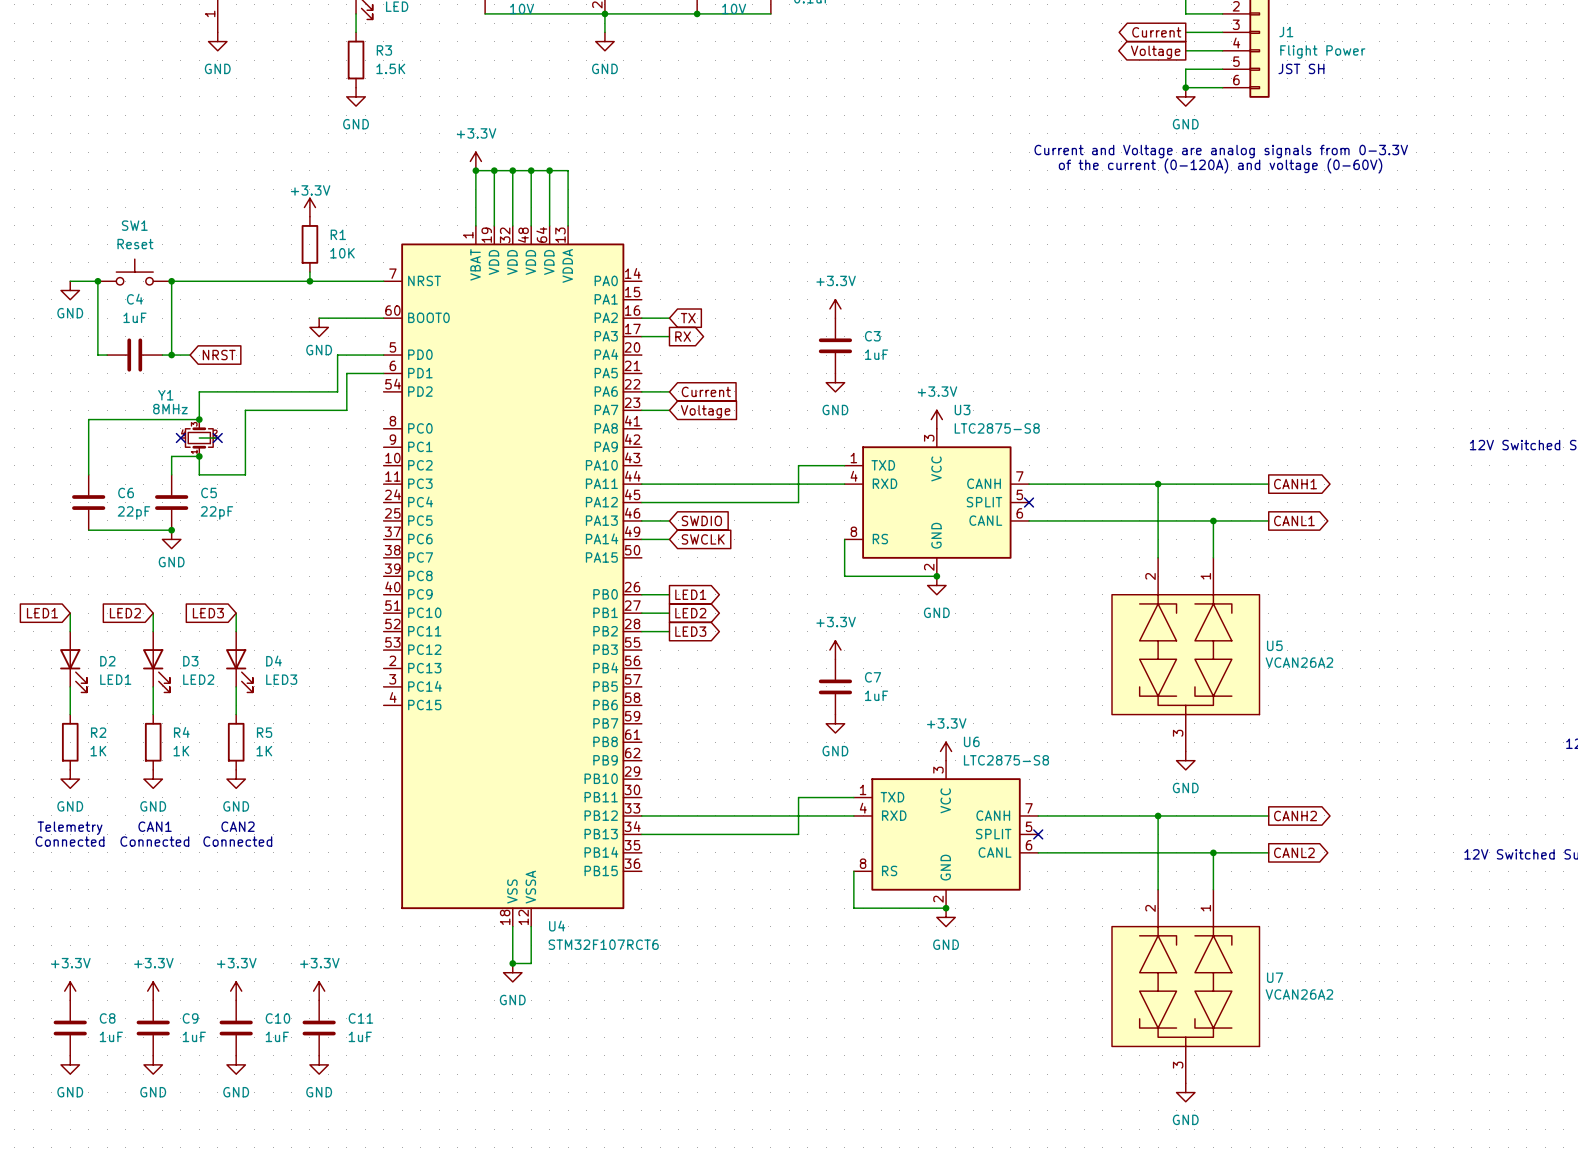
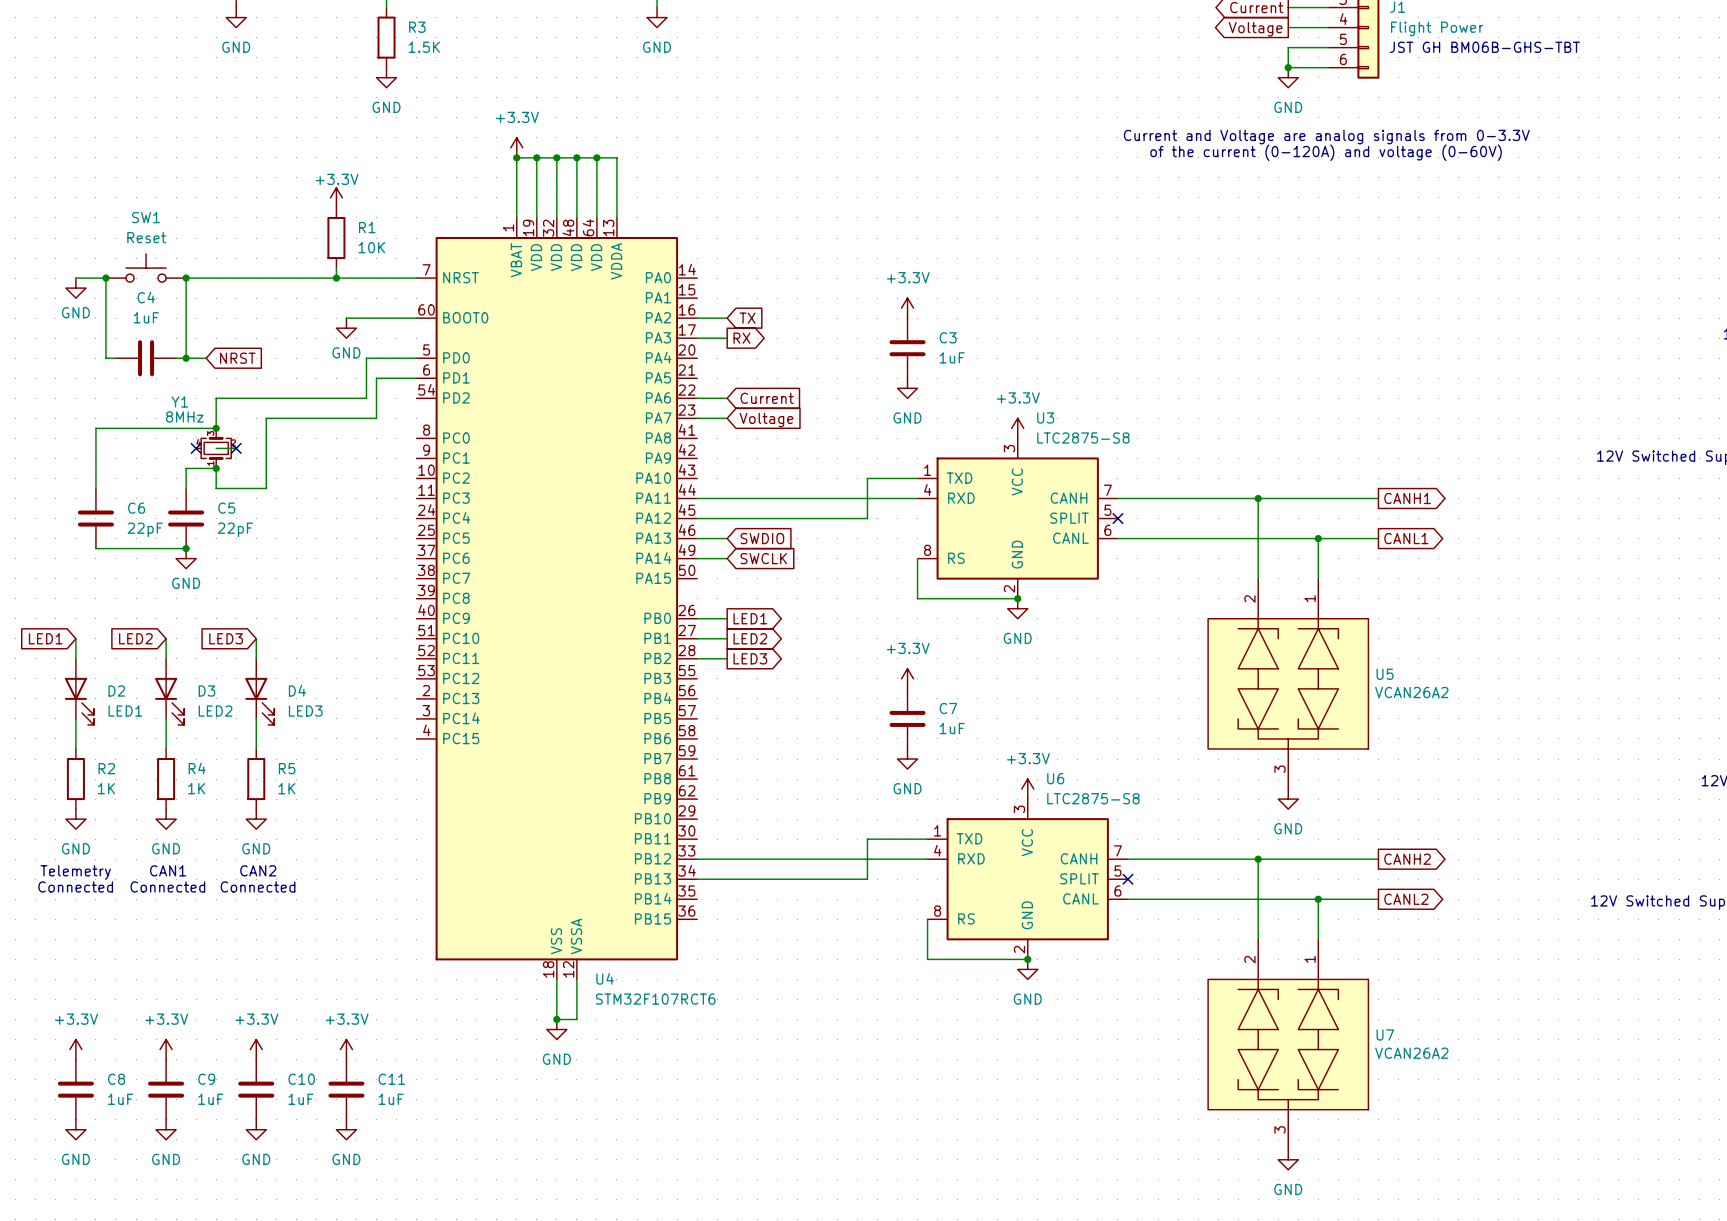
text: JST SH (1301, 68) -> none
text: none -> JST GH BM06B-GHS-TBT (1484, 47)

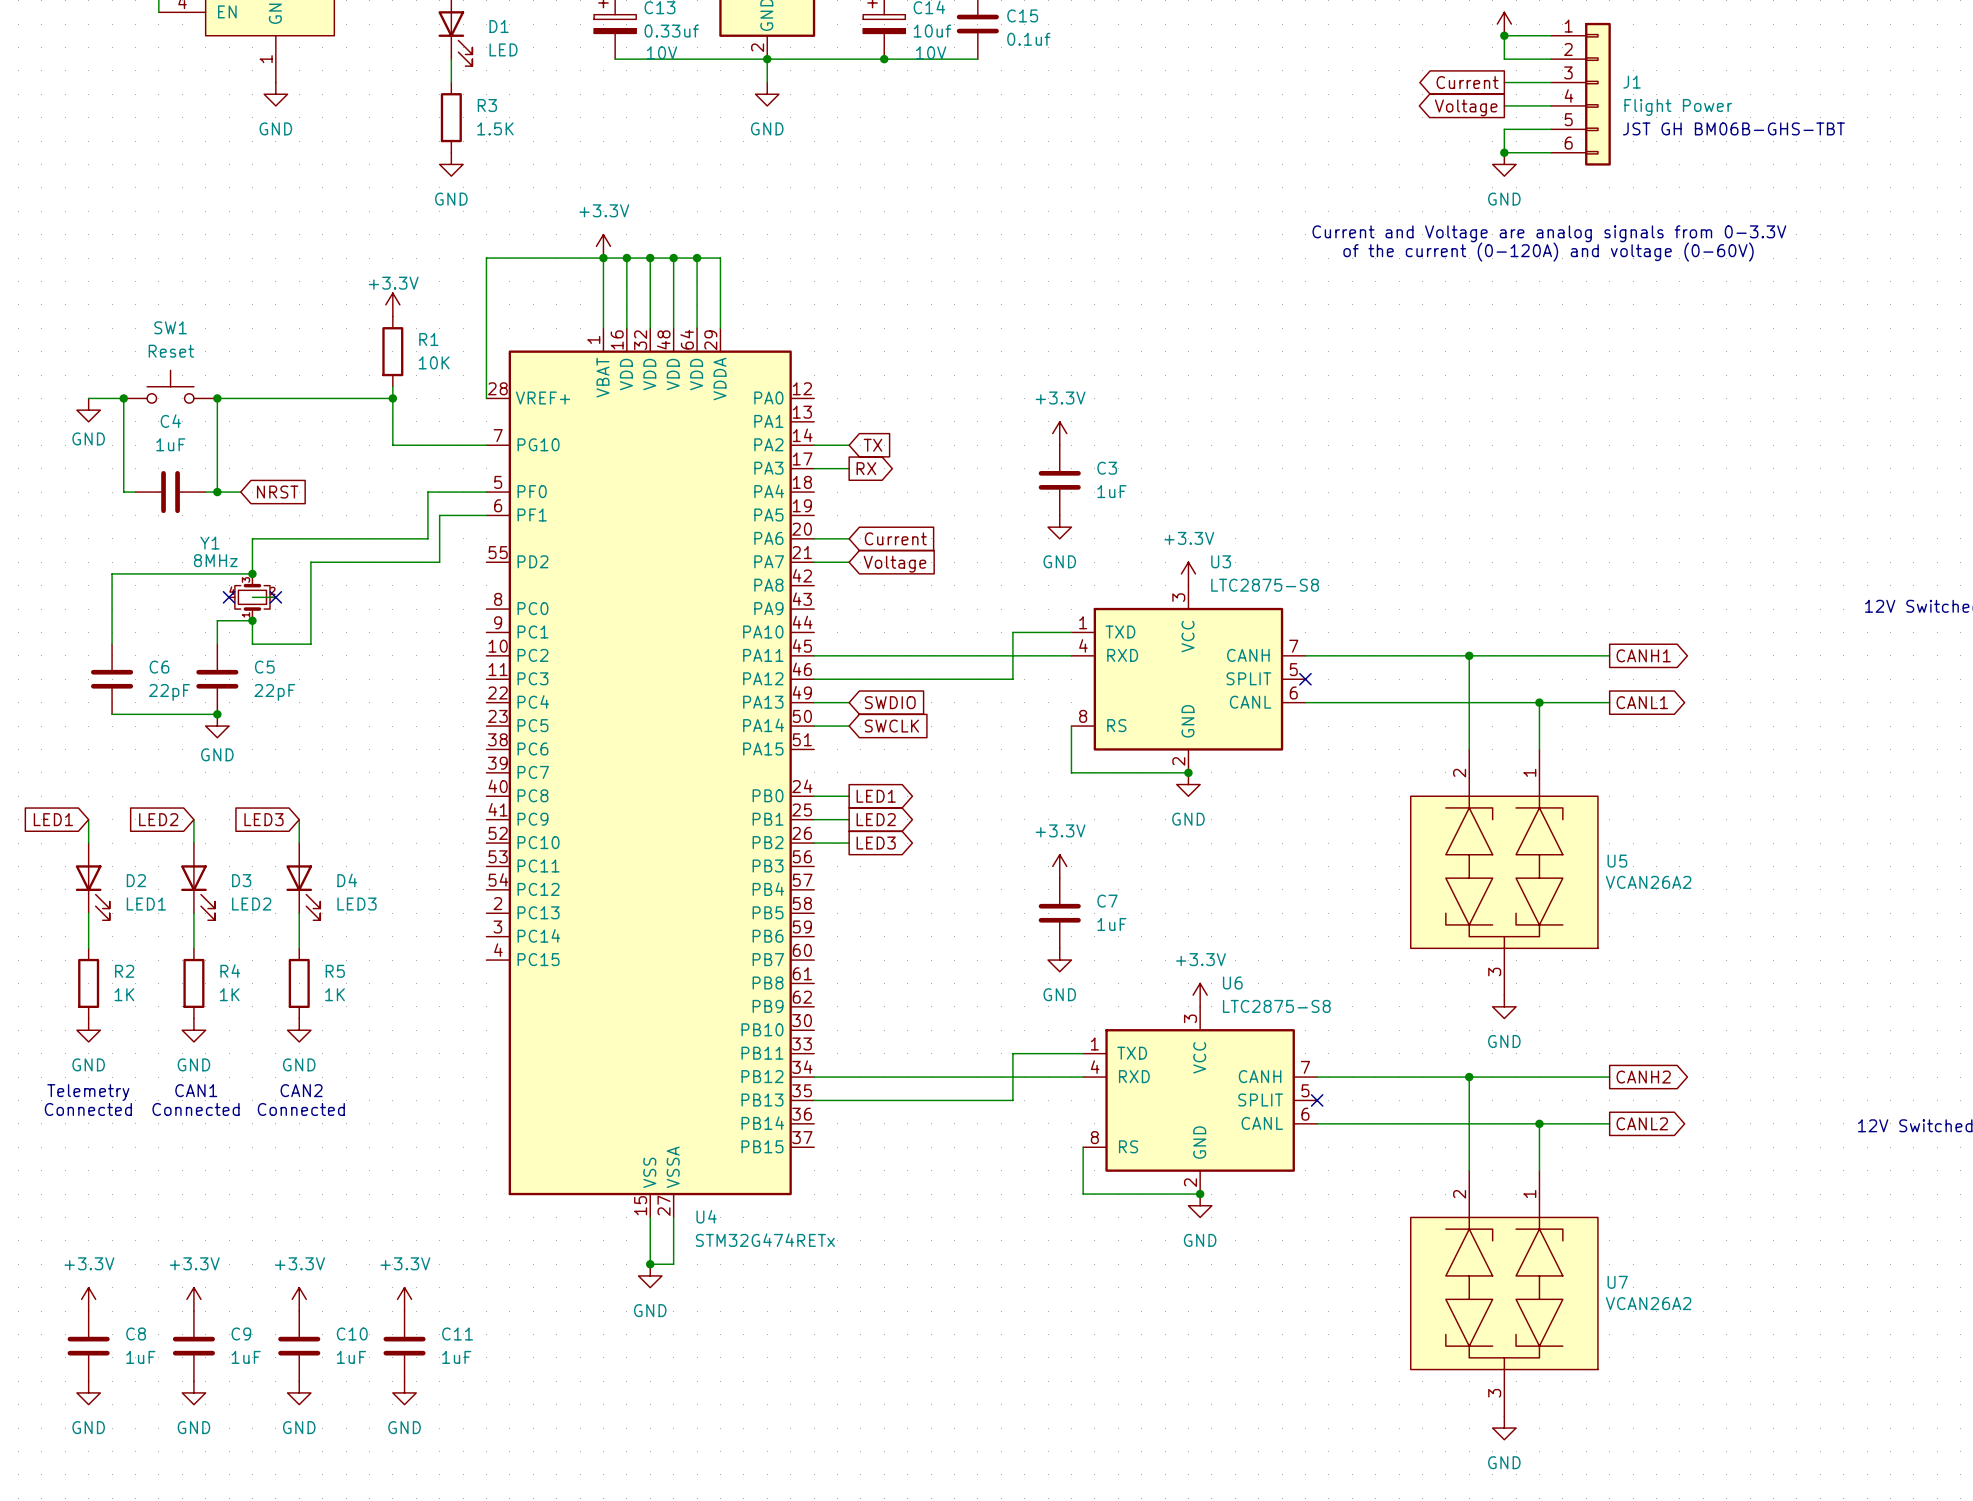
wire: none -> (603, 258) (486, 258) (486, 398)
U4 symbol: [416, 217, 698, 980] -> [486, 328, 815, 1218]
wire: (336, 278) (416, 278) -> (392, 398) (392, 445) (404, 445)
power symbol: GND (346, 328) -> none
U4 value: STM32F107RCT6 (655, 999) -> STM32G474RETx (765, 1240)

